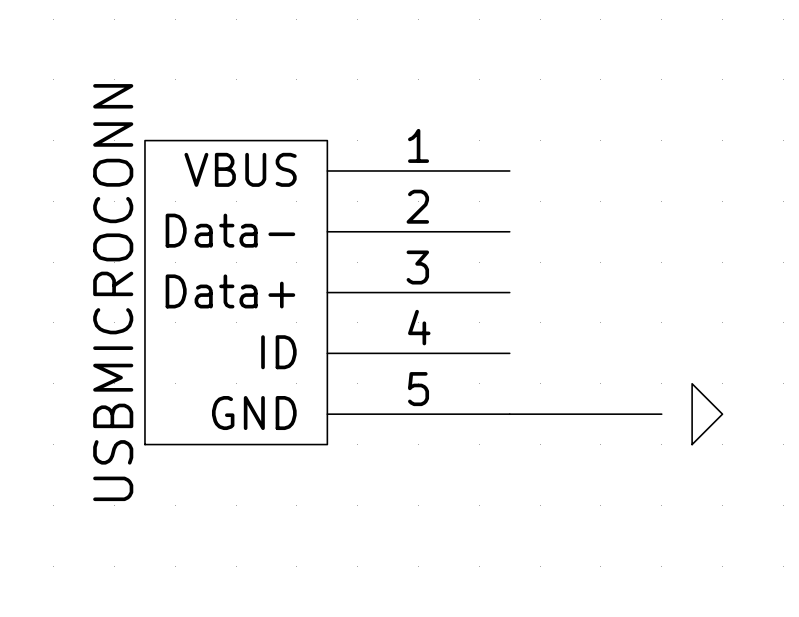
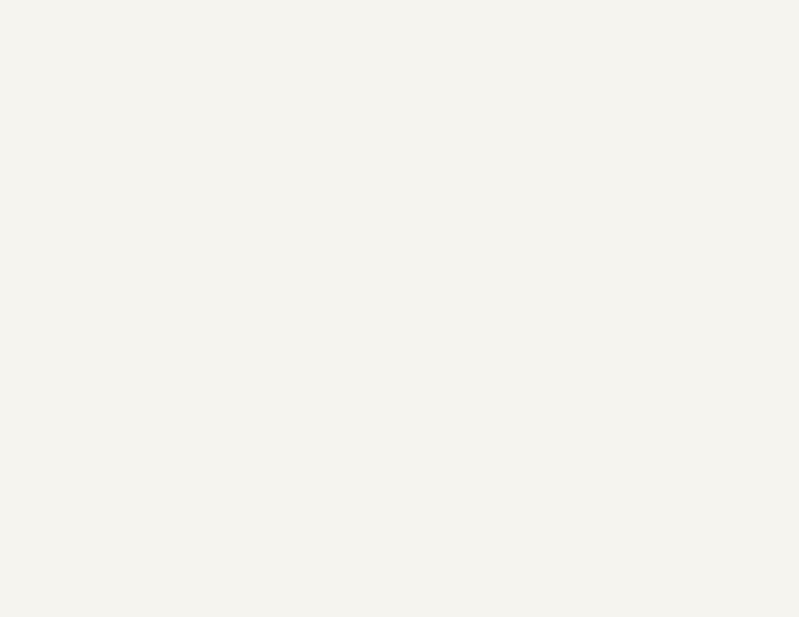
part: USBMICROCONN (327, 292) -> none
wire: (509, 414) (661, 414) -> none
power symbol: (707, 414) -> none

